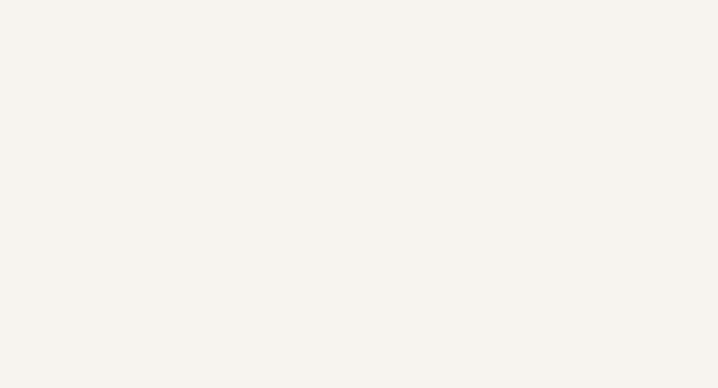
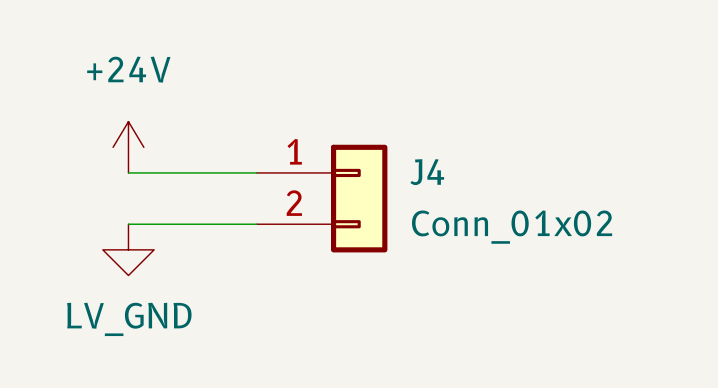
power symbol: none -> +24V (128, 147)
wire: none -> (128, 172) (256, 172)
J4: none -> Conn_01x02 (322, 198)
wire: none -> (128, 224) (256, 224)
power symbol: none -> LV_GND (128, 249)

